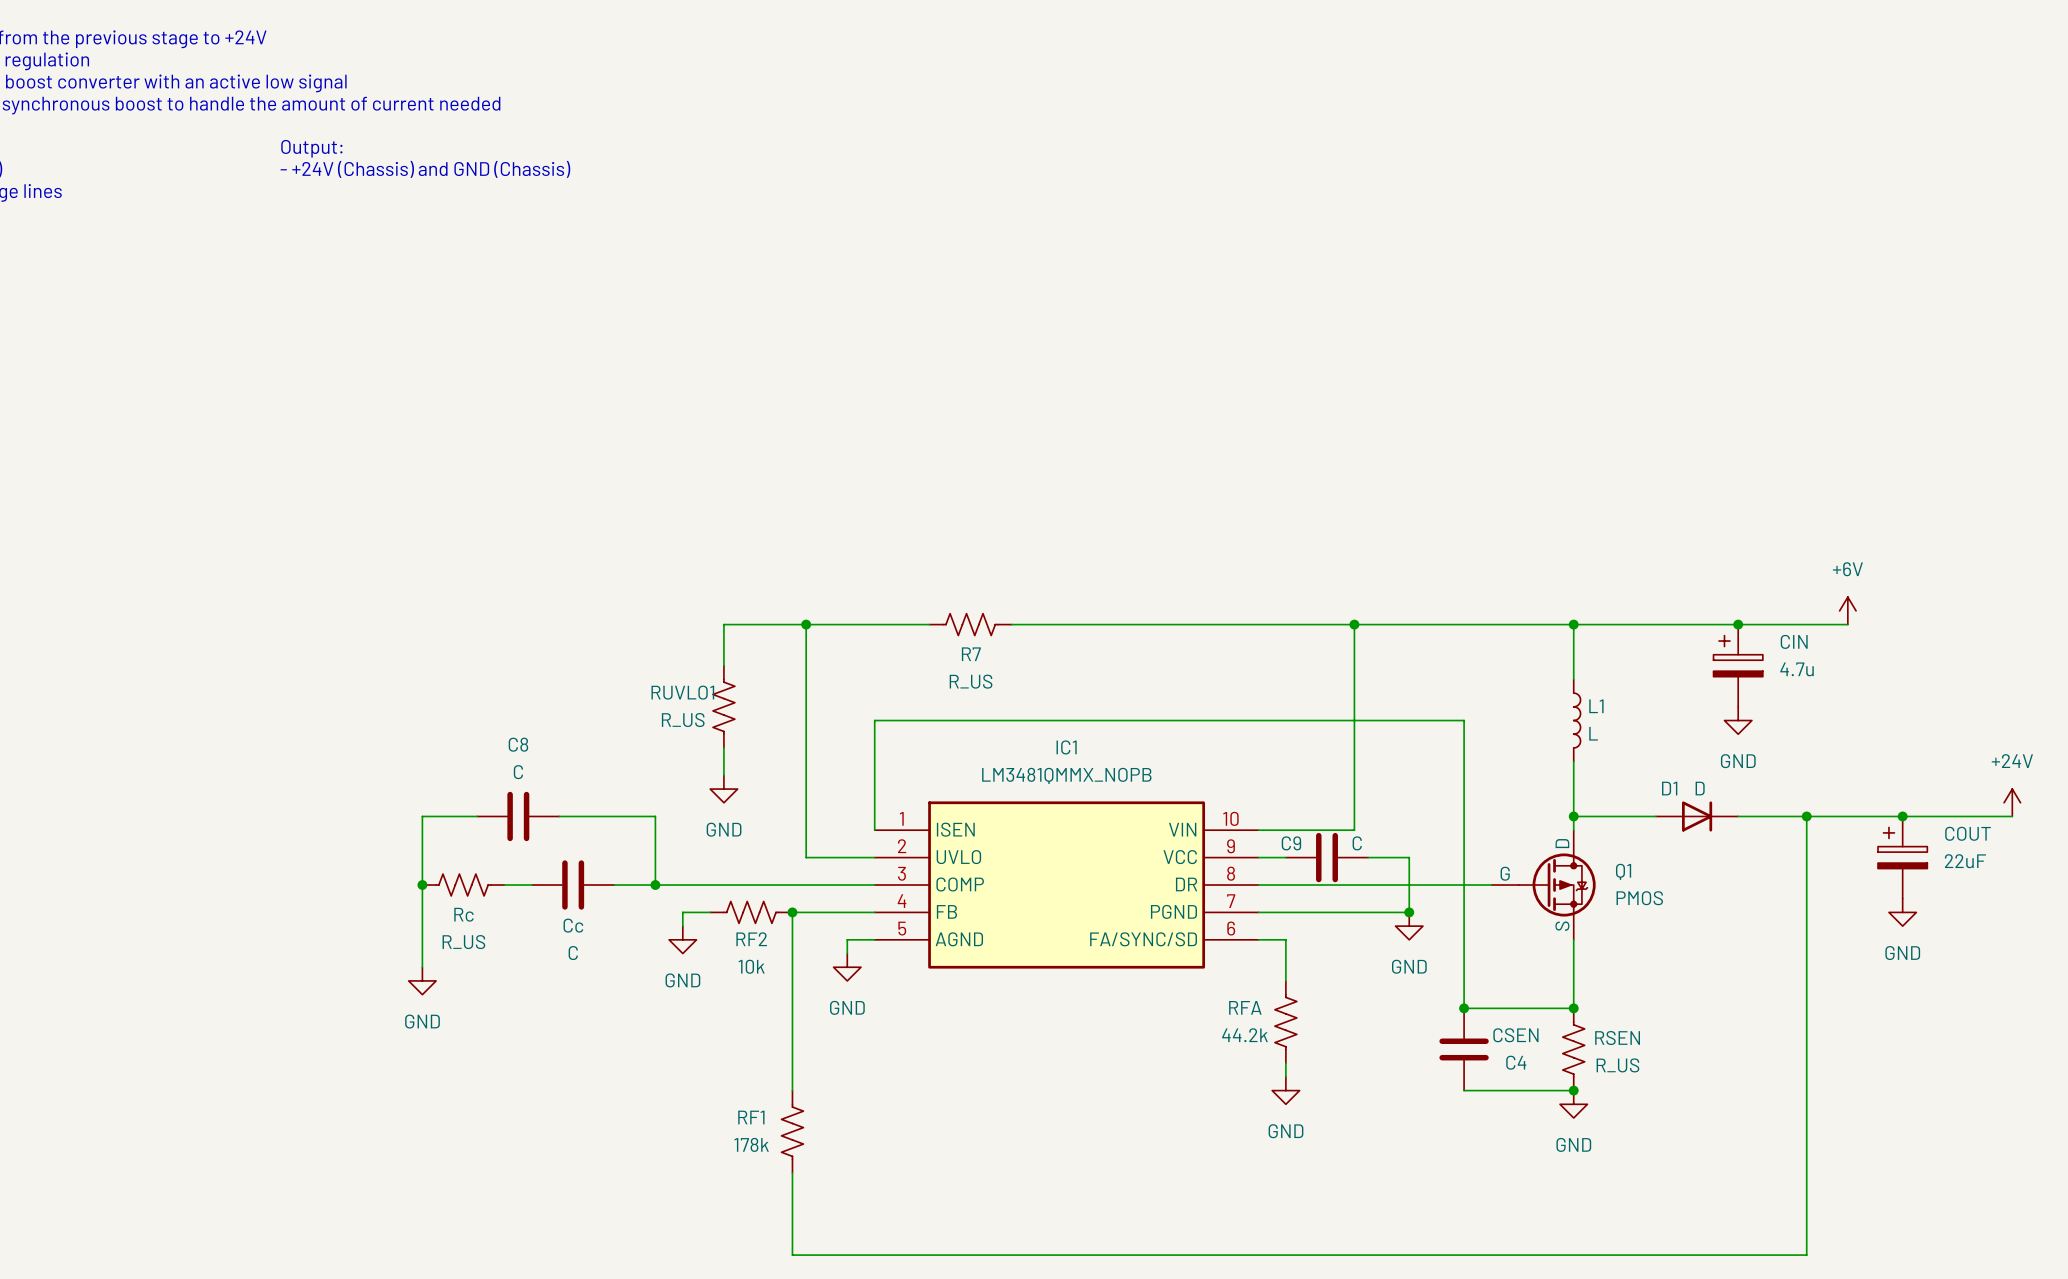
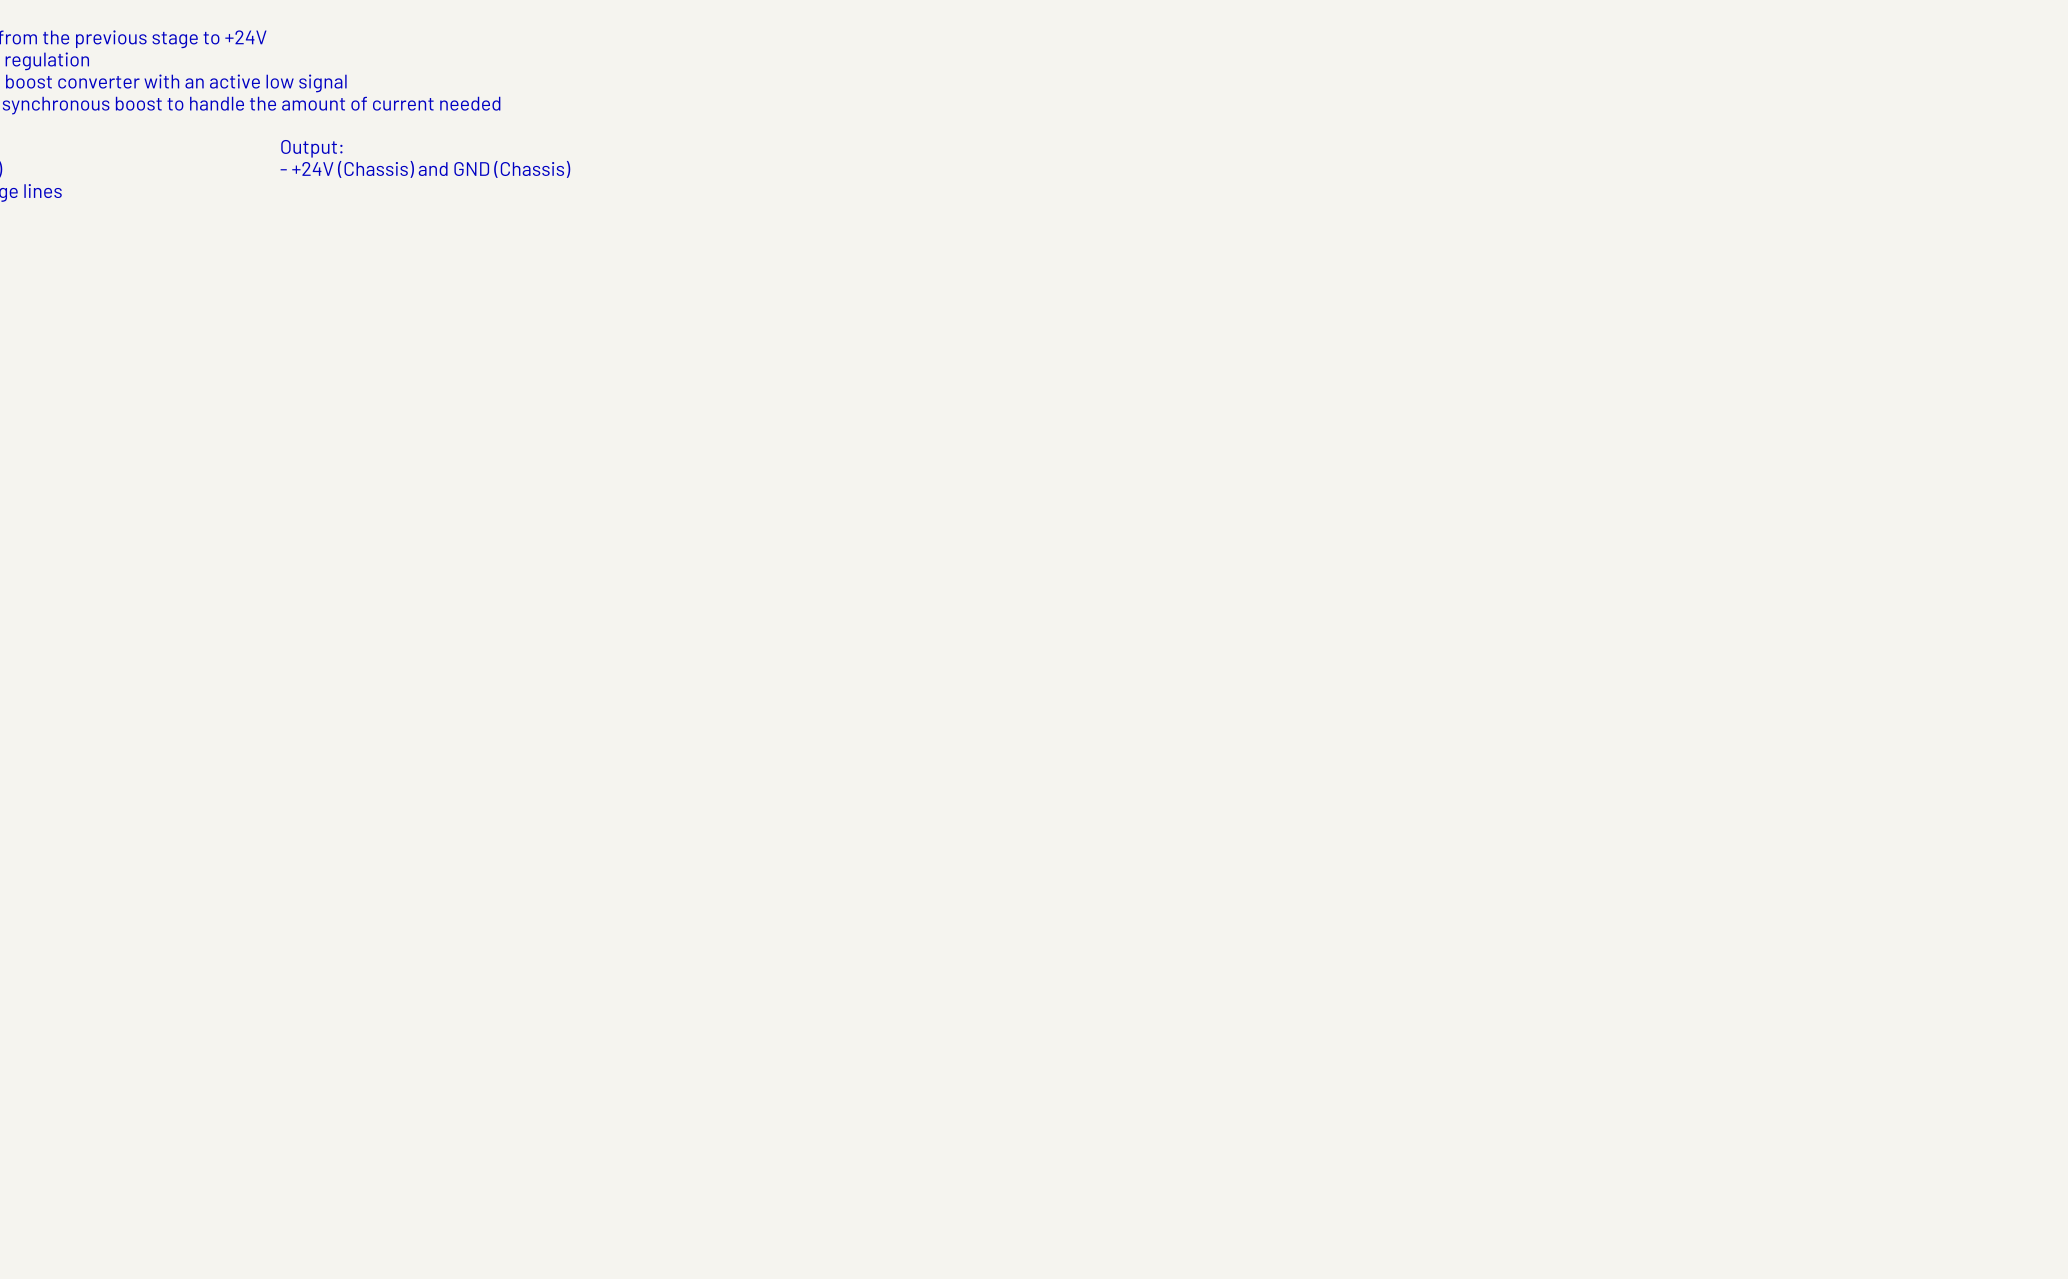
power symbol: +6V (1847, 610) -> none
wire: (806, 624) (806, 857) (874, 857) -> none
junction: (806, 624) -> none
wire: (929, 624) (723, 624) (723, 665) -> none
R7: R_US (970, 624) -> none
wire: (1011, 624) (1847, 624) -> none
wire: (1354, 624) (1354, 830) (1258, 830) -> none
junction: (1354, 624) -> none
wire: (1573, 624) (1573, 679) -> none
junction: (1573, 624) -> none
junction: (1738, 624) -> none
CIN: 4.7u (1738, 665) -> none
RUVLO1: R_US (723, 706) -> none
L1: L (1577, 720) -> none
power symbol: GND (1738, 720) -> none
wire: (723, 747) (723, 775) -> none
wire: (1573, 761) (1573, 830) -> none
power symbol: GND (723, 789) -> none
power symbol: +24V (2012, 802) -> none
wire: (477, 816) (422, 816) (422, 967) -> none
C8: C (518, 816) -> none
wire: (559, 816) (655, 816) (655, 885) -> none
wire: (1573, 816) (1655, 816) -> none
junction: (1573, 816) -> none
D1: D (1697, 816) -> none
wire: (1738, 816) (2012, 816) -> none
wire: (1806, 816) (1806, 1255) (792, 1255) (792, 1172) -> none
junction: (1806, 816) -> none
junction: (1902, 816) -> none
wire: (874, 830) (874, 720) (1464, 720) (1464, 1008) (1573, 1008) (1573, 939) -> none
wire: (1258, 857) (1285, 857) -> none
C9: C (1327, 857) -> none
wire: (1368, 857) (1409, 857) (1409, 912) (1258, 912) -> none
COUT: 22uF (1902, 857) -> none
junction: (422, 885) -> none
Rc: R_US (463, 885) -> none
wire: (504, 885) (532, 885) -> none
Cc: C (573, 885) -> none
wire: (614, 885) (874, 885) -> none
junction: (655, 885) -> none
IC1: LM3481QMMX_NOPB (1066, 885) -> none
wire: (1258, 885) (1491, 885) -> none
Q1: PMOS (1543, 885) -> none
wire: (710, 912) (682, 912) (682, 926) -> none
RF2: 10k (751, 912) -> none
junction: (792, 912) -> none
wire: (874, 912) (792, 912) (792, 1090) -> none
junction: (1409, 912) -> none
power symbol: GND (1902, 912) -> none
power symbol: GND (1409, 926) -> none
power symbol: GND (682, 939) -> none
wire: (874, 939) (847, 939) (847, 953) -> none
wire: (1258, 939) (1285, 939) (1285, 980) -> none
power symbol: GND (847, 967) -> none
power symbol: GND (422, 980) -> none
junction: (1464, 1008) -> none
junction: (1573, 1008) -> none
RFA: 44.2k (1285, 1022) -> none
C4: CSEN (1464, 1049) -> none
RSEN: R_US (1573, 1049) -> none
wire: (1285, 1063) (1285, 1076) -> none
power symbol: GND (1285, 1090) -> none
wire: (1464, 1090) (1573, 1090) -> none
junction: (1573, 1090) -> none
power symbol: GND (1573, 1104) -> none
RF1: 178k (792, 1131) -> none

